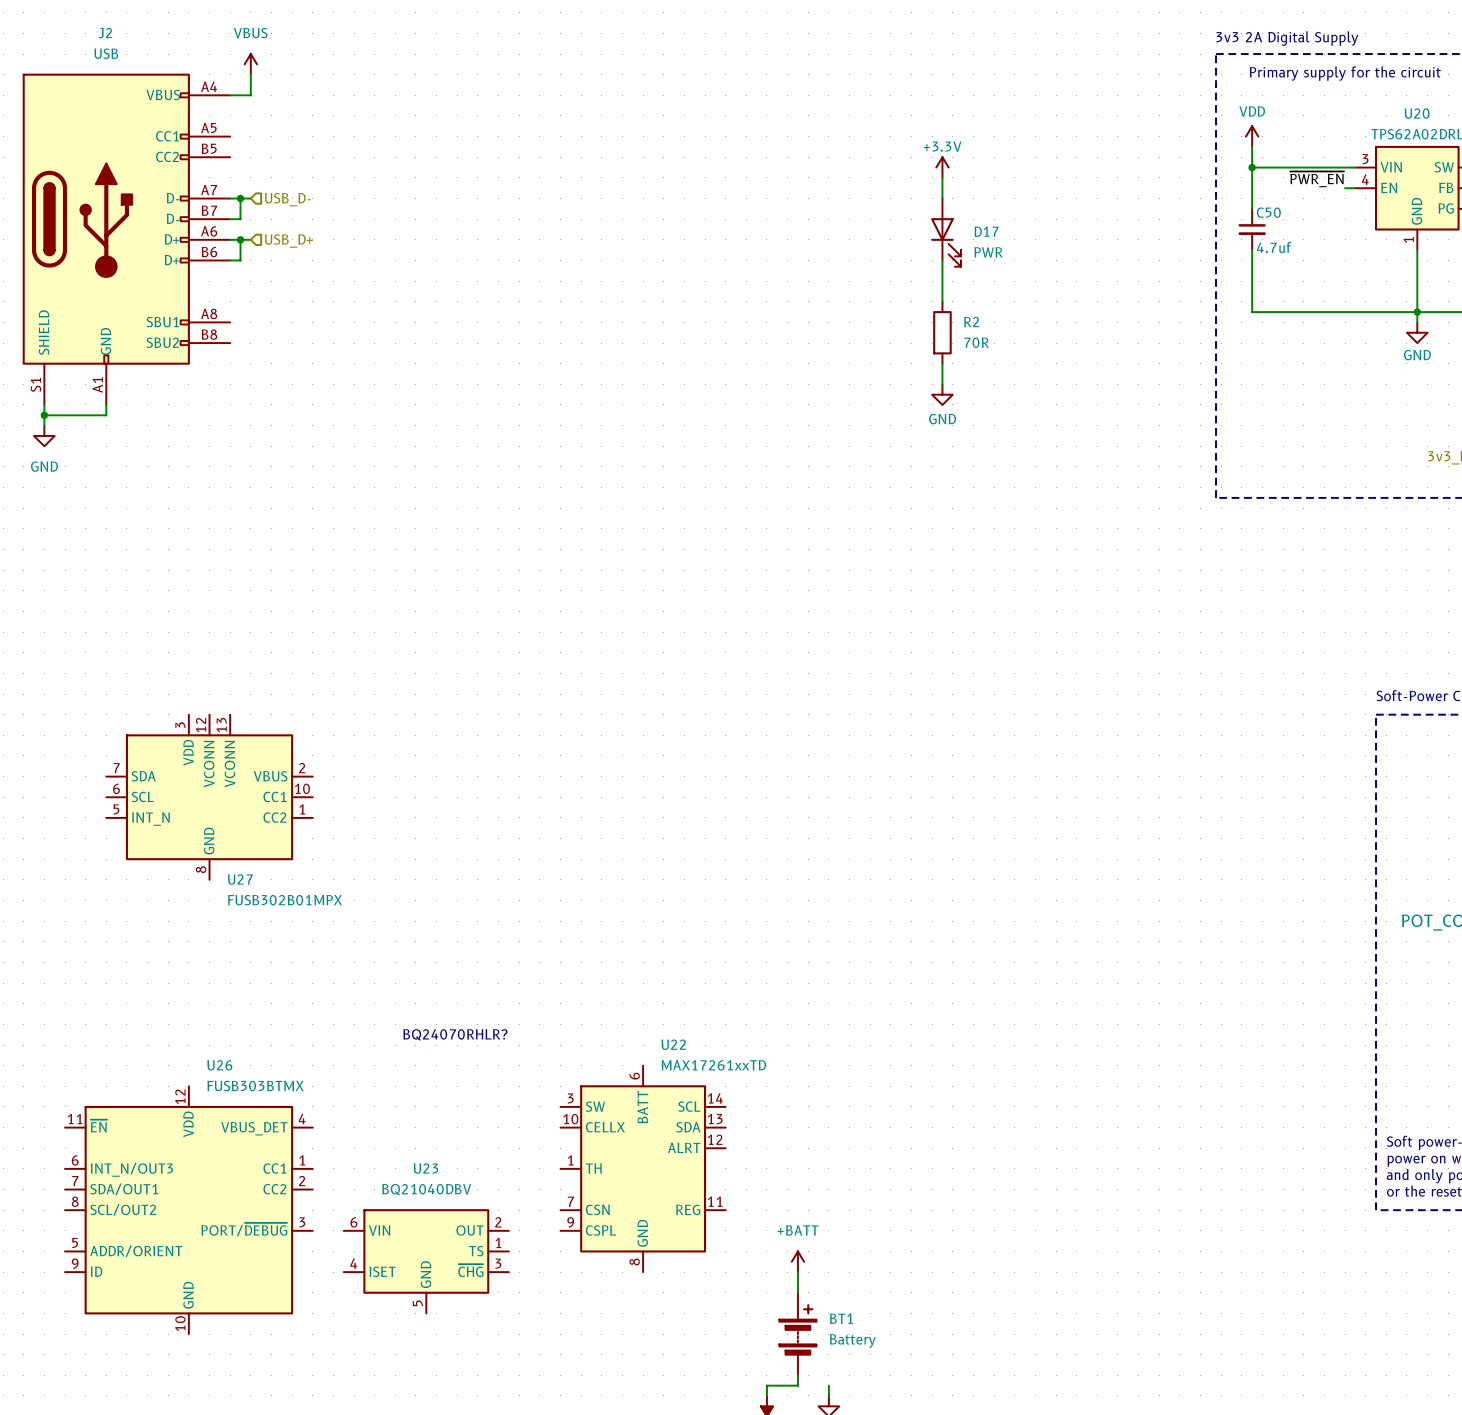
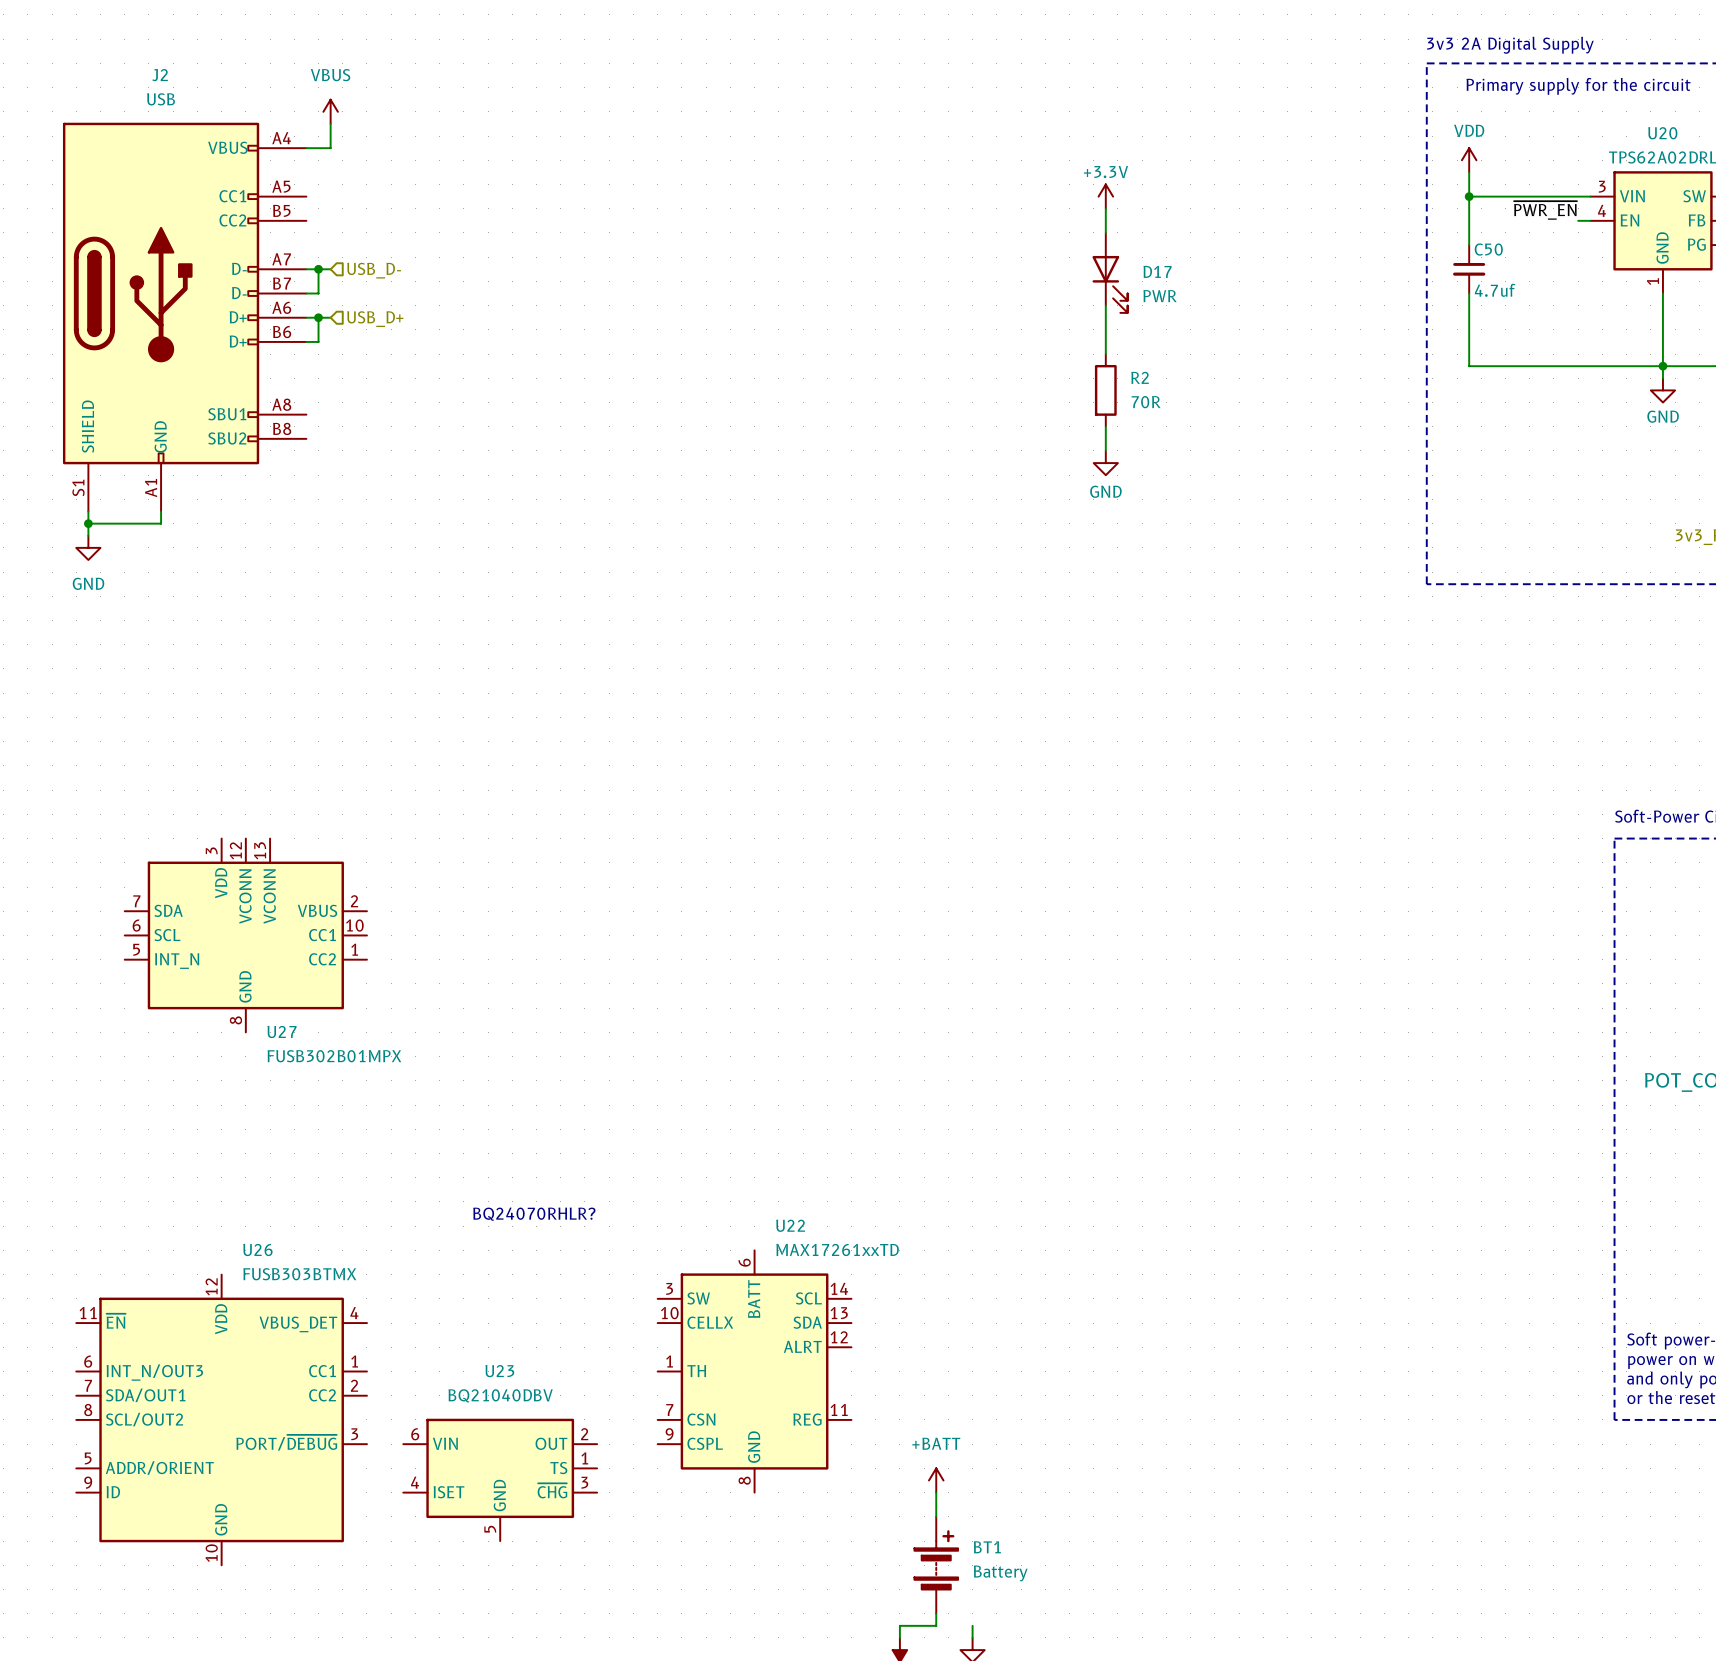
power symbol position: VBUS (250, 64) -> VBUS (330, 111)
wire: (250, 74) (250, 95) (230, 95) -> (330, 123) (330, 148) (306, 148)
wire: (230, 198) (250, 198) -> (306, 269) (330, 269)
wire: (240, 198) (240, 219) (230, 219) -> (318, 269) (318, 293) (306, 293)
junction: (240, 198) -> none
hierarchical label position: USB_D- (287, 199) -> USB_D- (374, 270)
junction: none -> (318, 269)
J2 position: (126, 239) -> (184, 317)
wire: (230, 239) (250, 239) -> (306, 317) (330, 317)
wire: (240, 239) (240, 260) (230, 260) -> (318, 317) (318, 341) (306, 341)
junction: (240, 239) -> none
hierarchical label position: USB_D+ (288, 240) -> USB_D+ (375, 319)
junction: none -> (318, 317)
wire: (44, 404) (44, 425) -> (88, 511) (88, 535)
wire: (106, 404) (106, 415) (44, 415) -> (161, 511) (161, 523) (88, 523)
junction position: (44, 415) -> (88, 523)
power symbol position: GND (44, 435) -> GND (88, 547)

